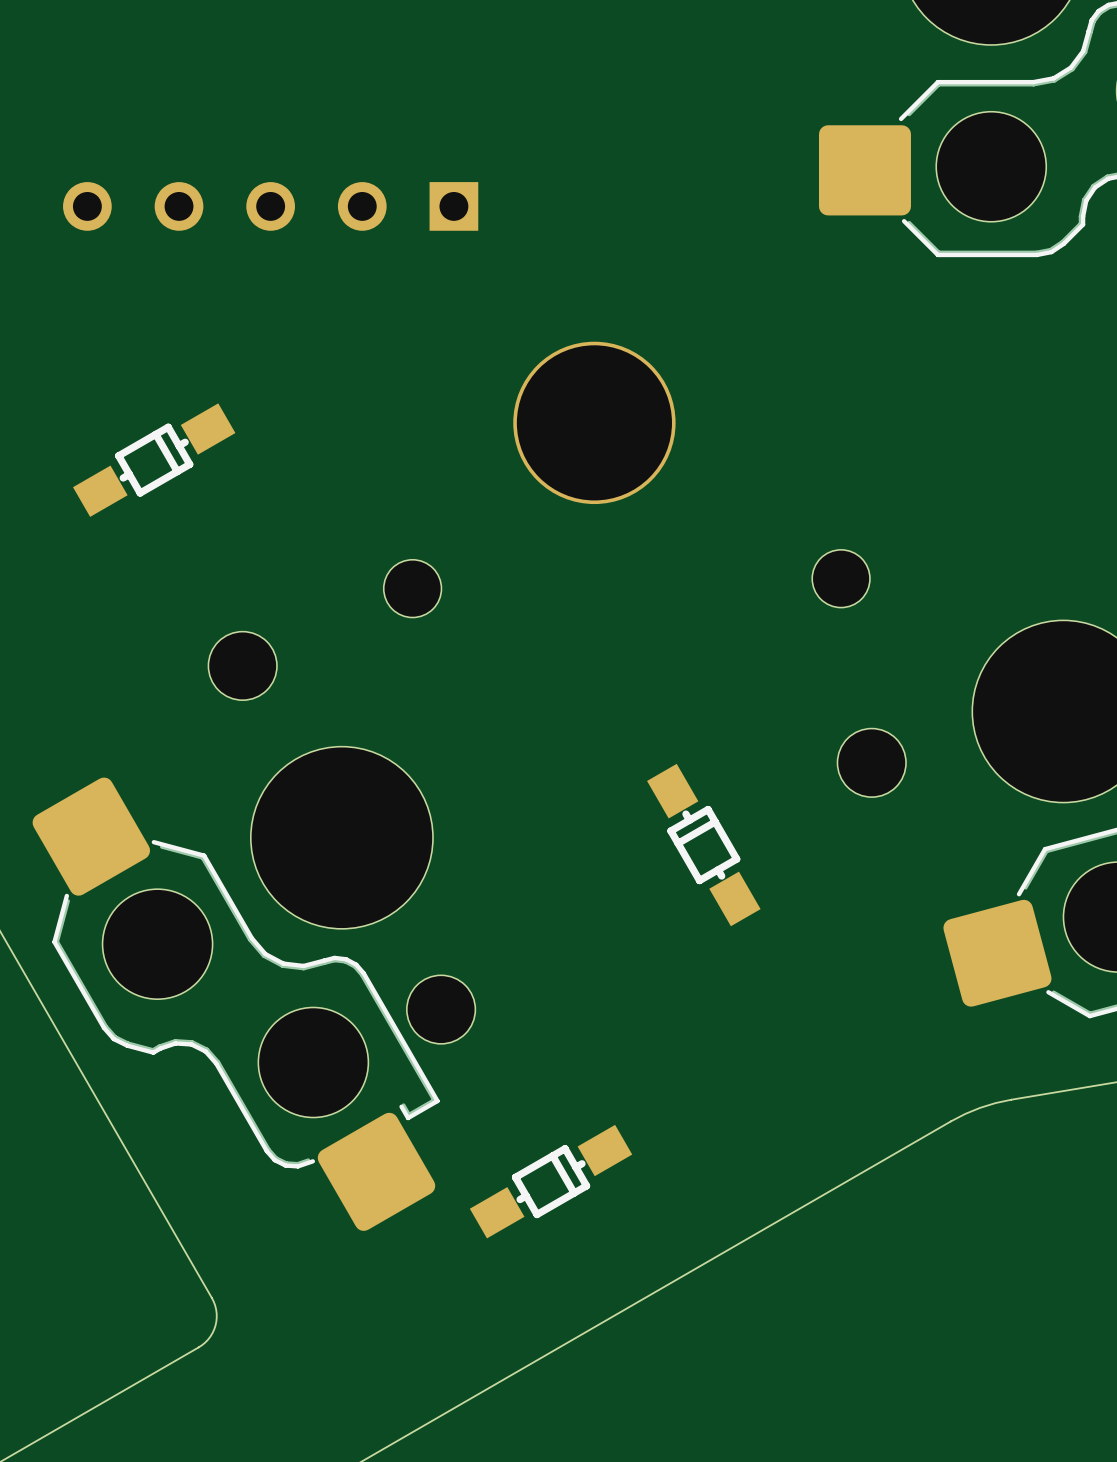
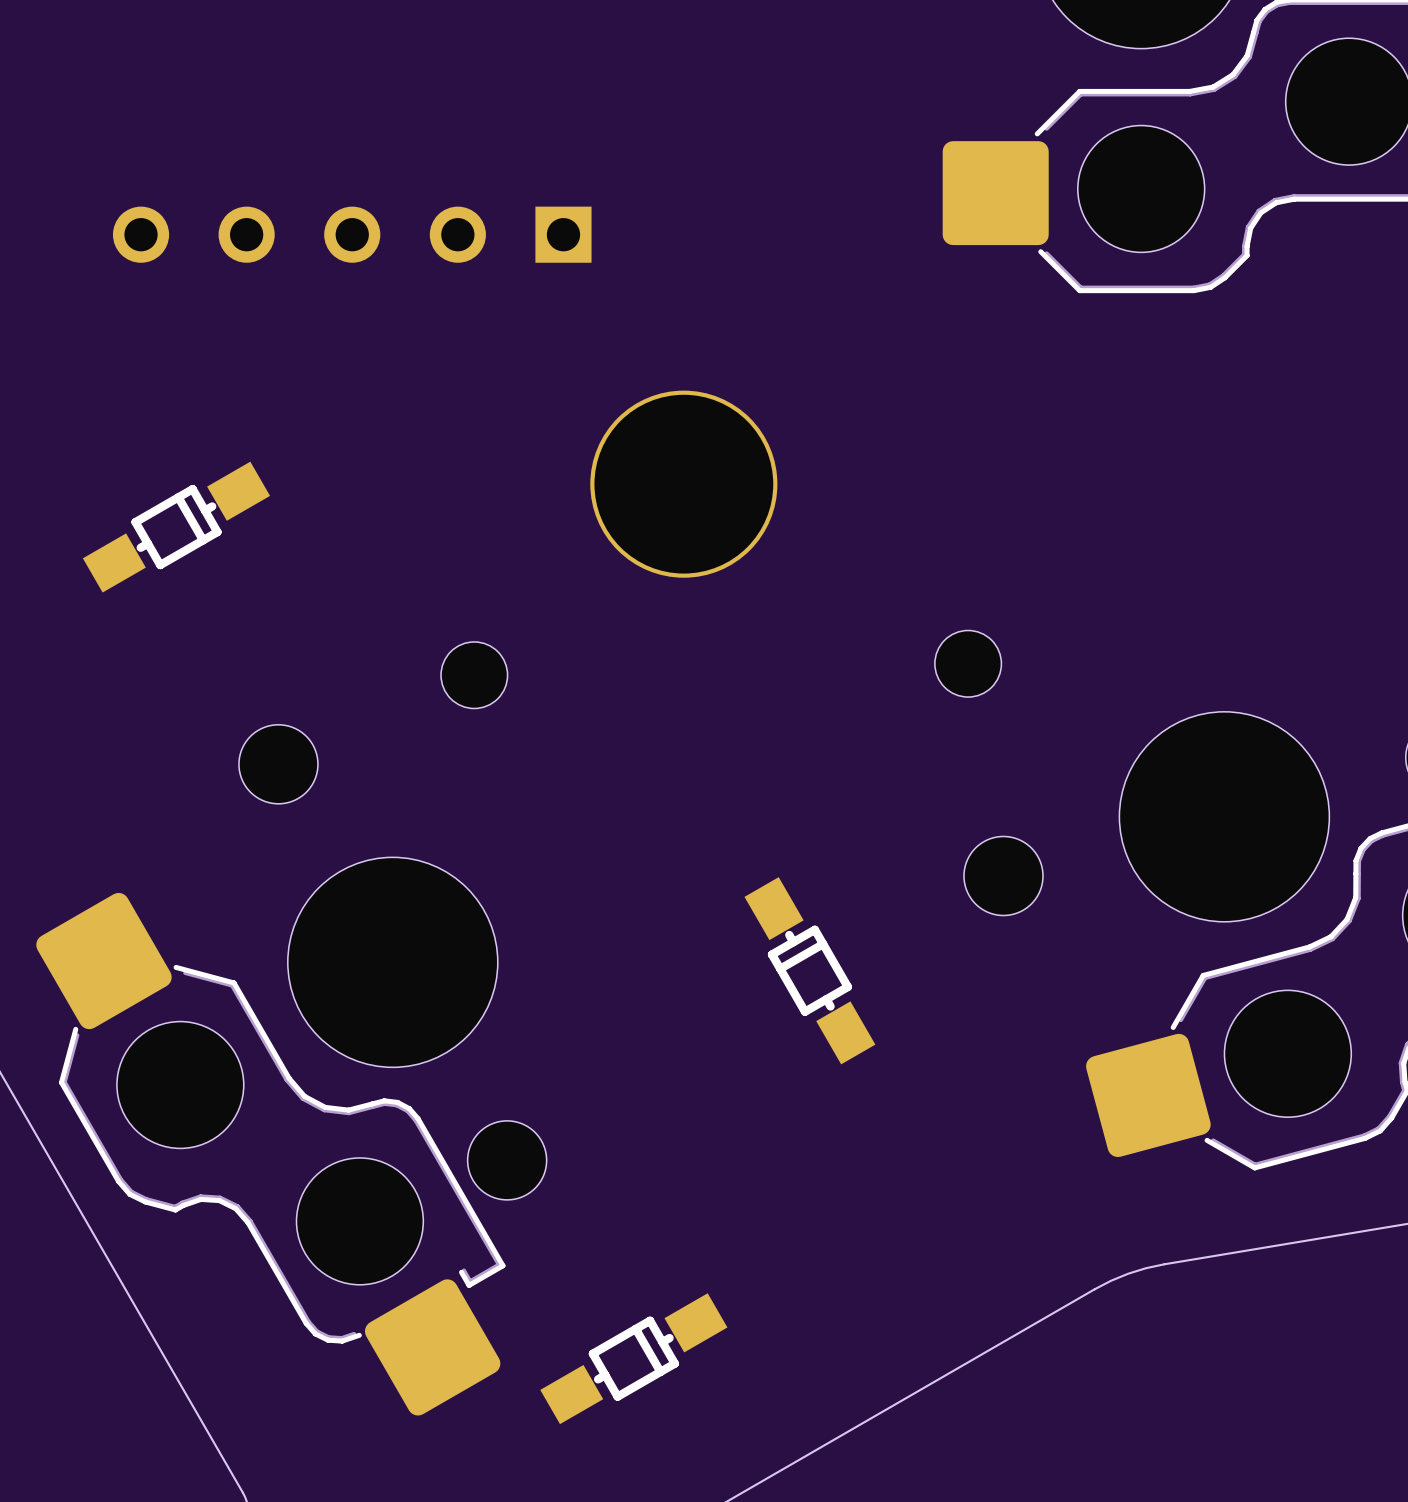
part position: (270, 206) -> (352, 234)

